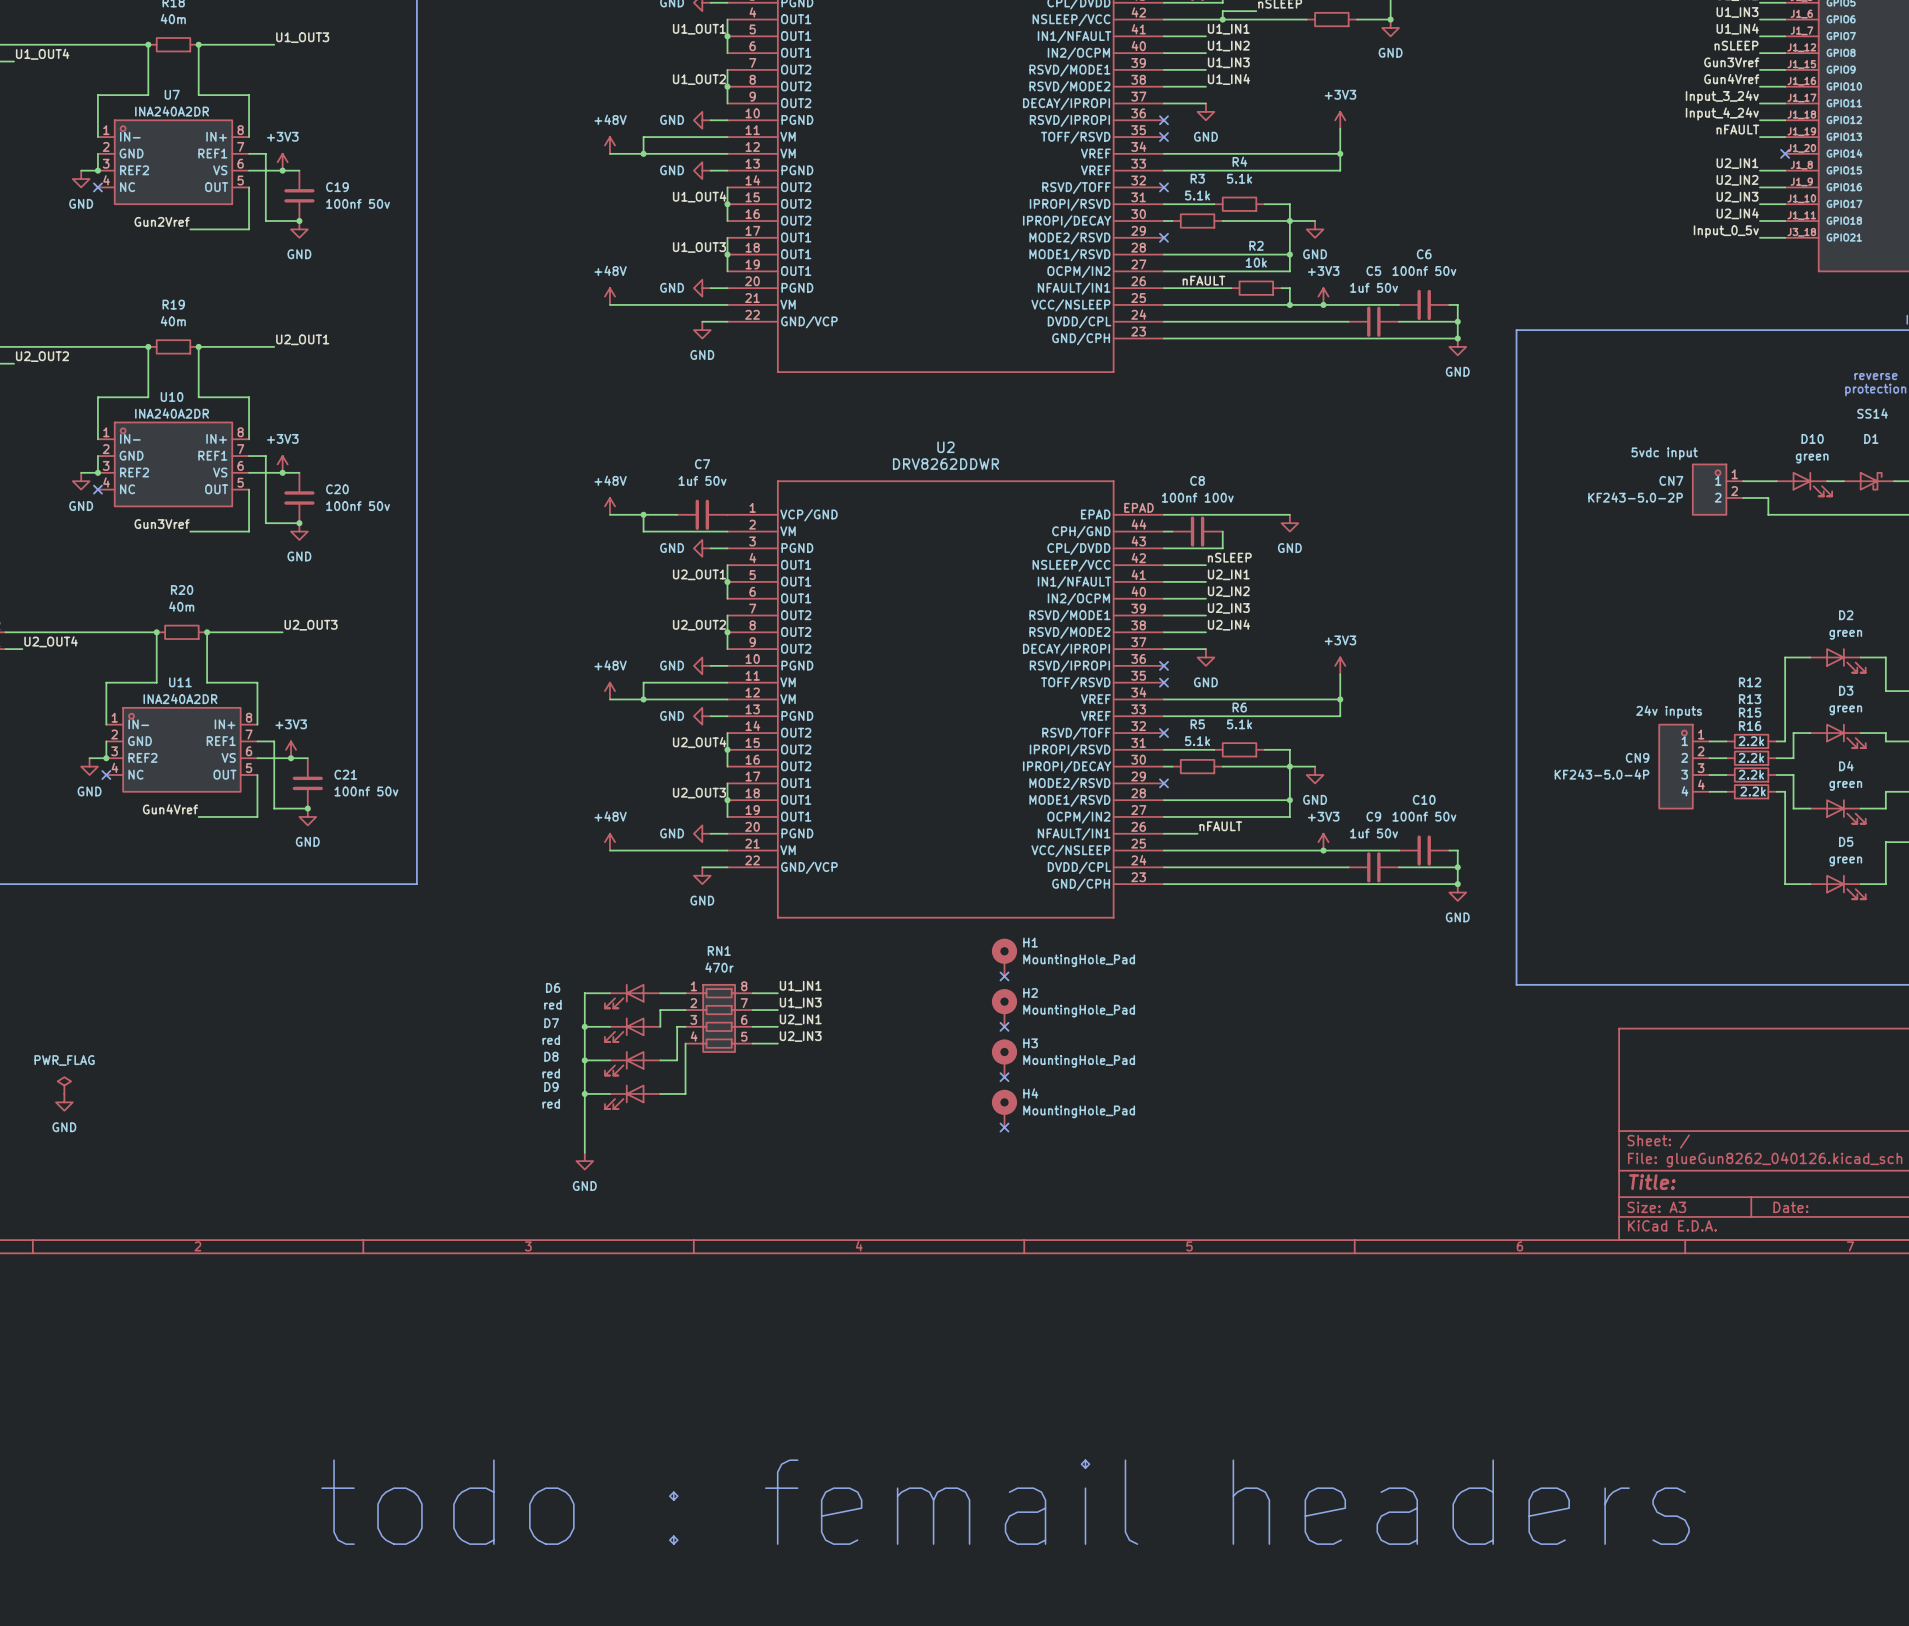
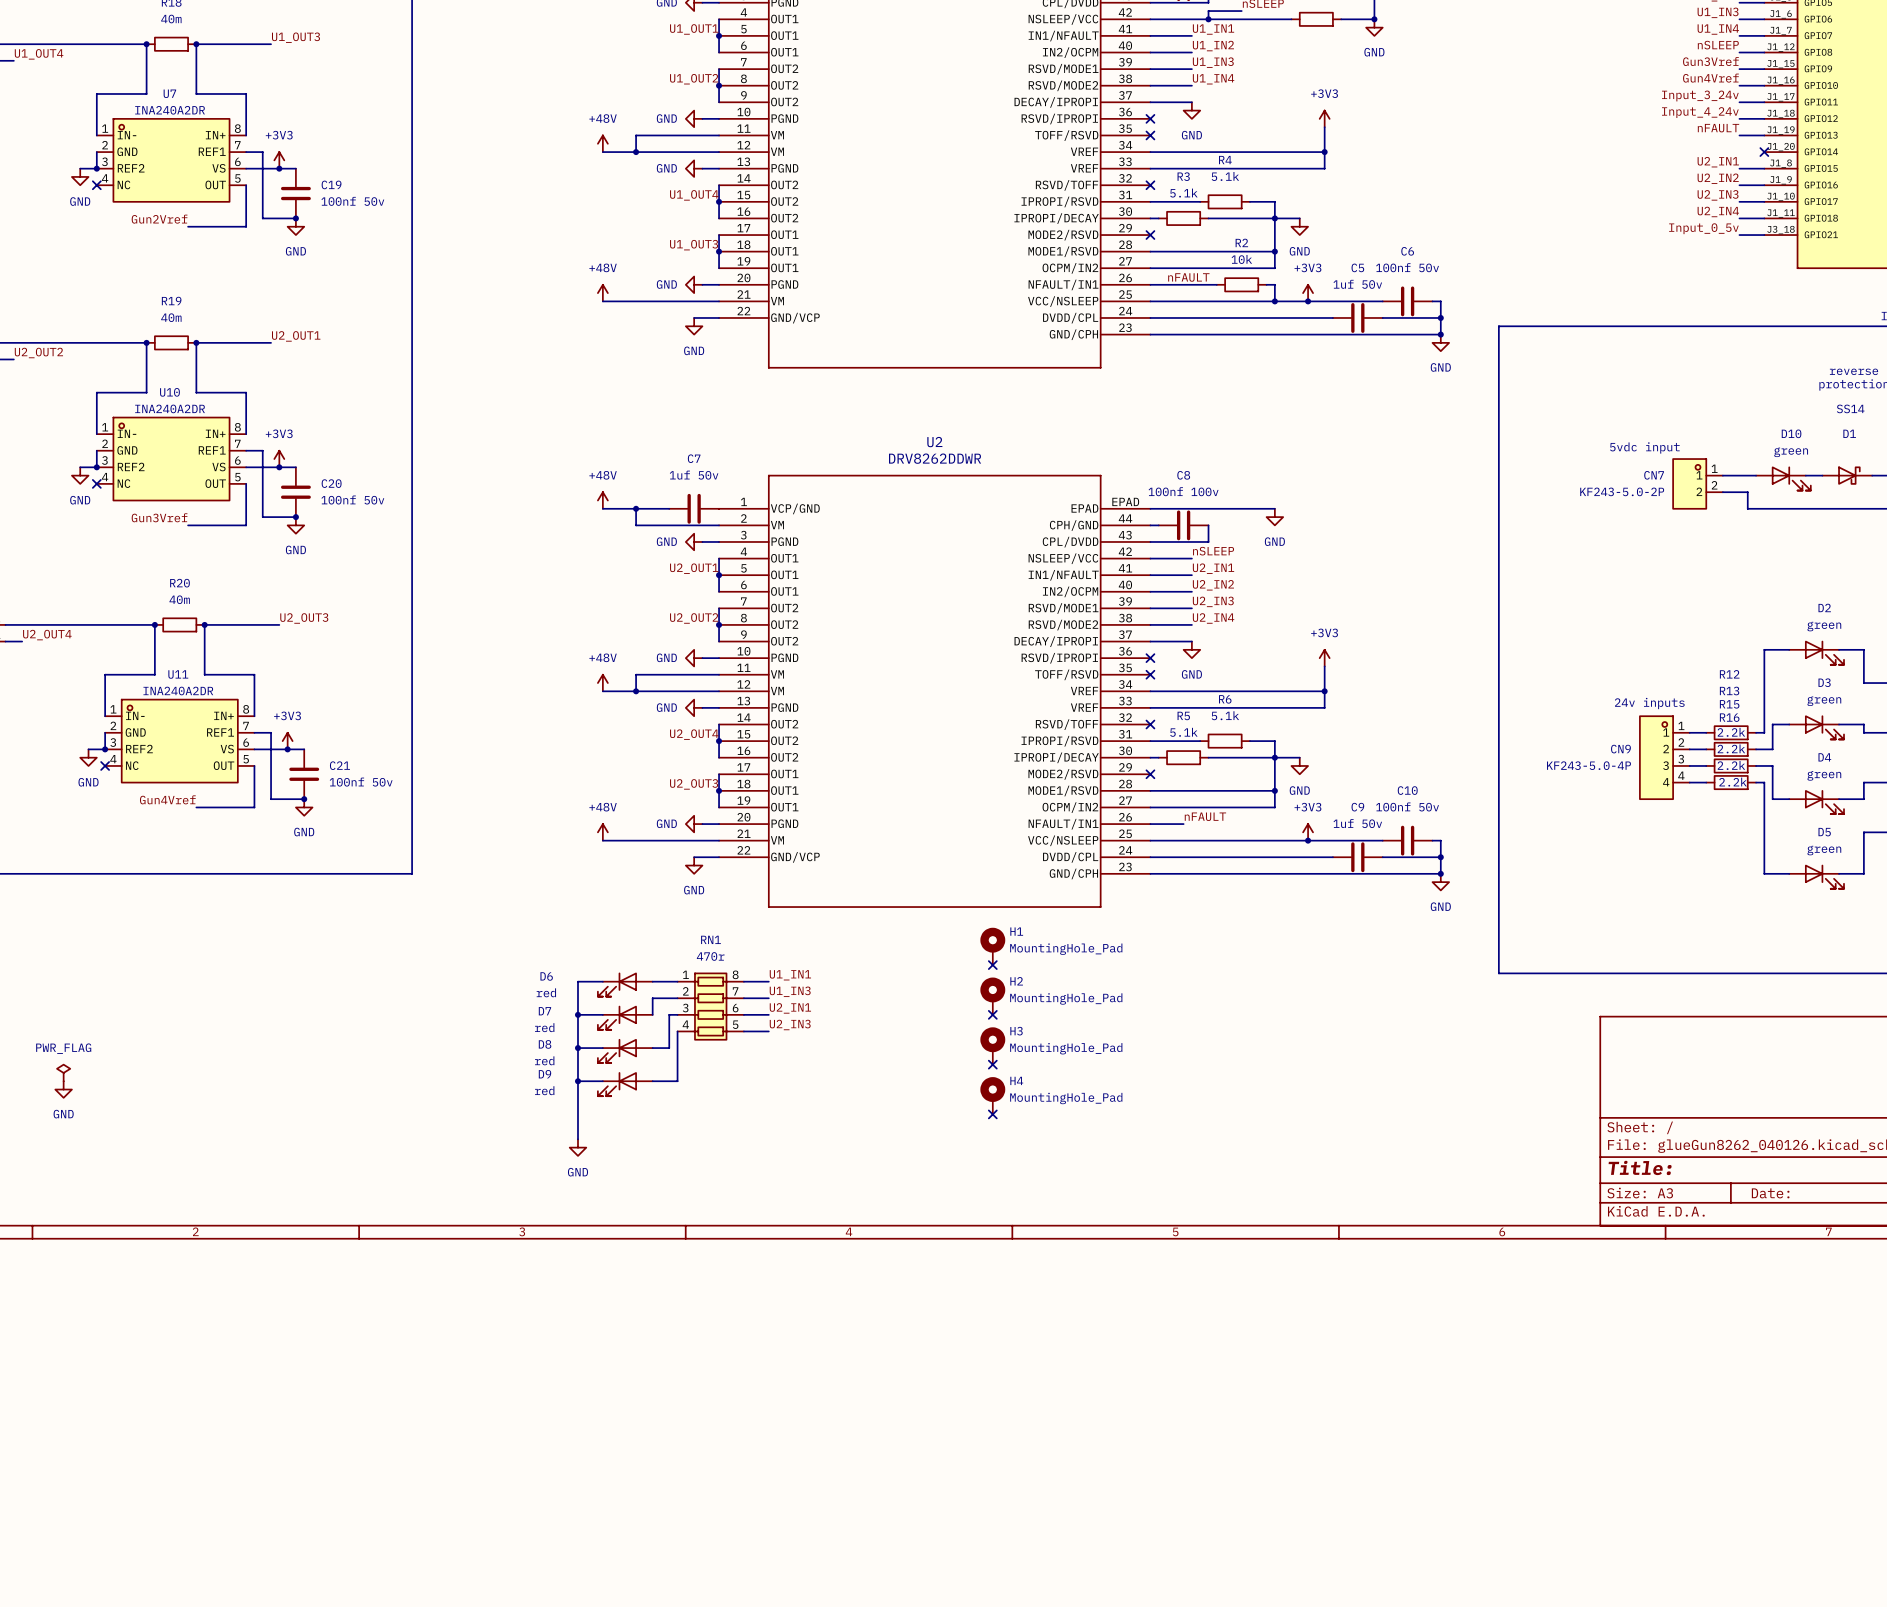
text: todo : femail headers (1005, 1502) -> none

